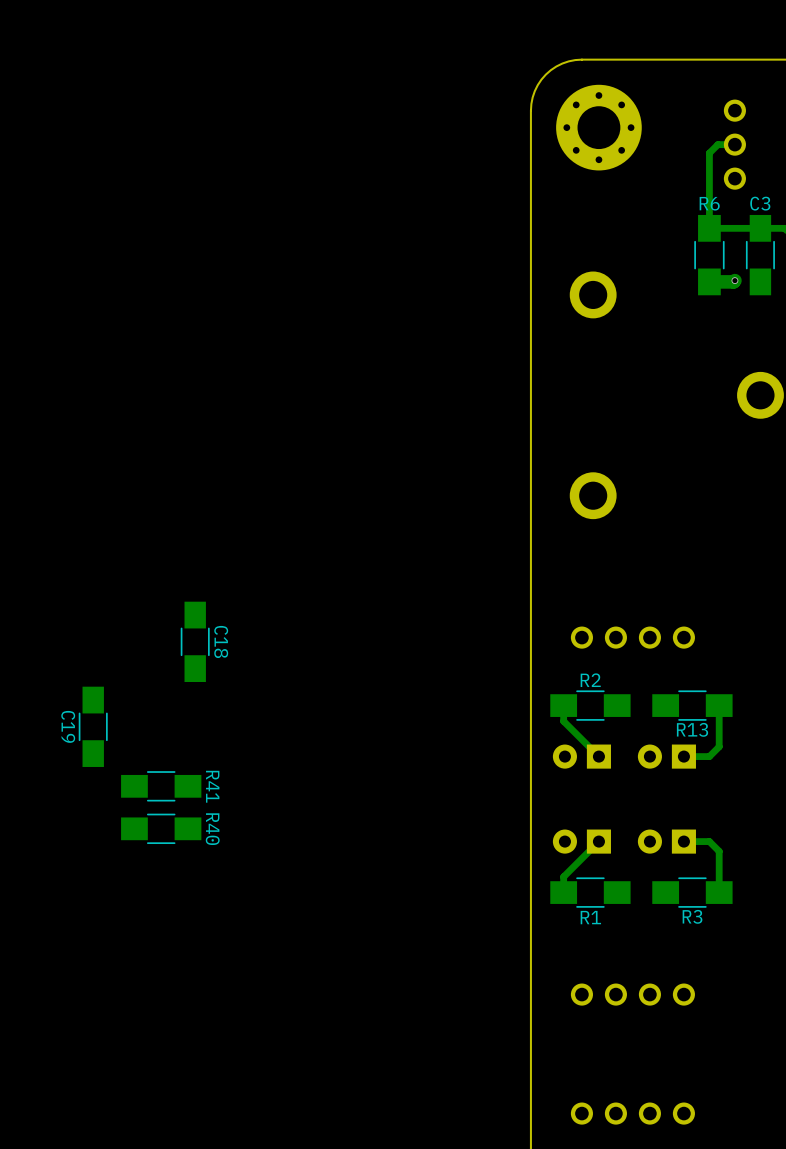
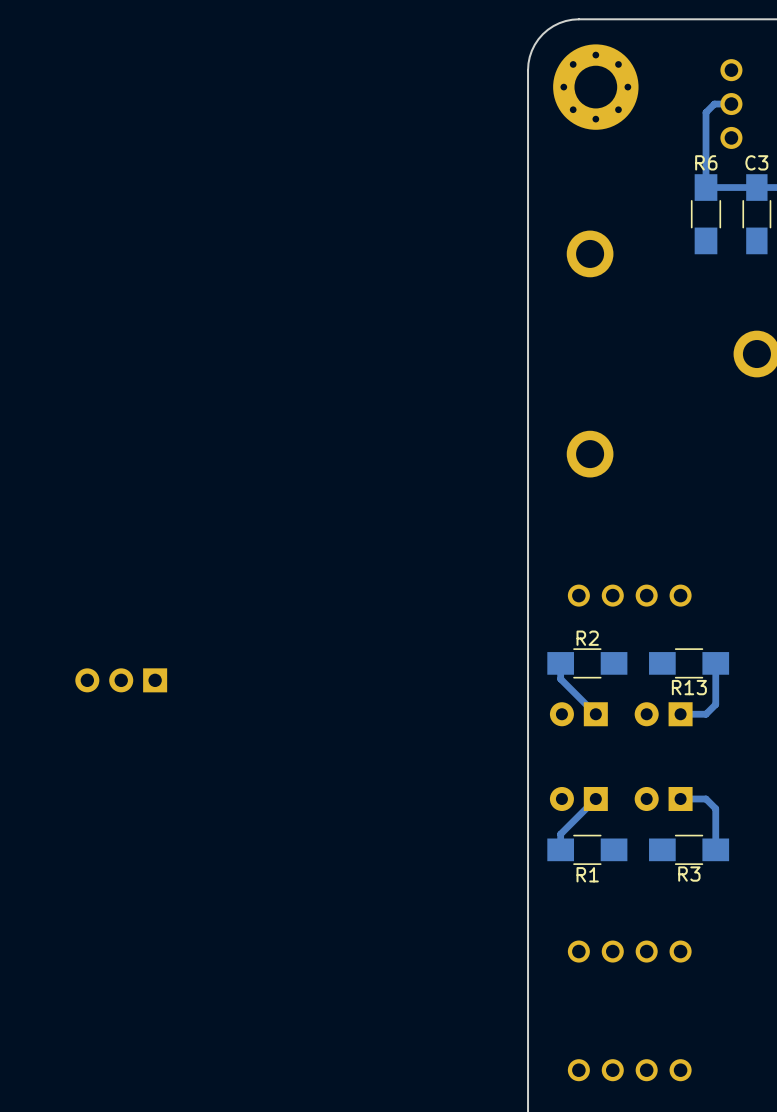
track: (734, 280) (709, 281) -> none
via: (734, 280) -> none
C18: (195, 641) -> none
part: none -> (121, 680)
C19: (93, 726) -> none
R41: (161, 786) -> none
R40: (161, 828) -> none

